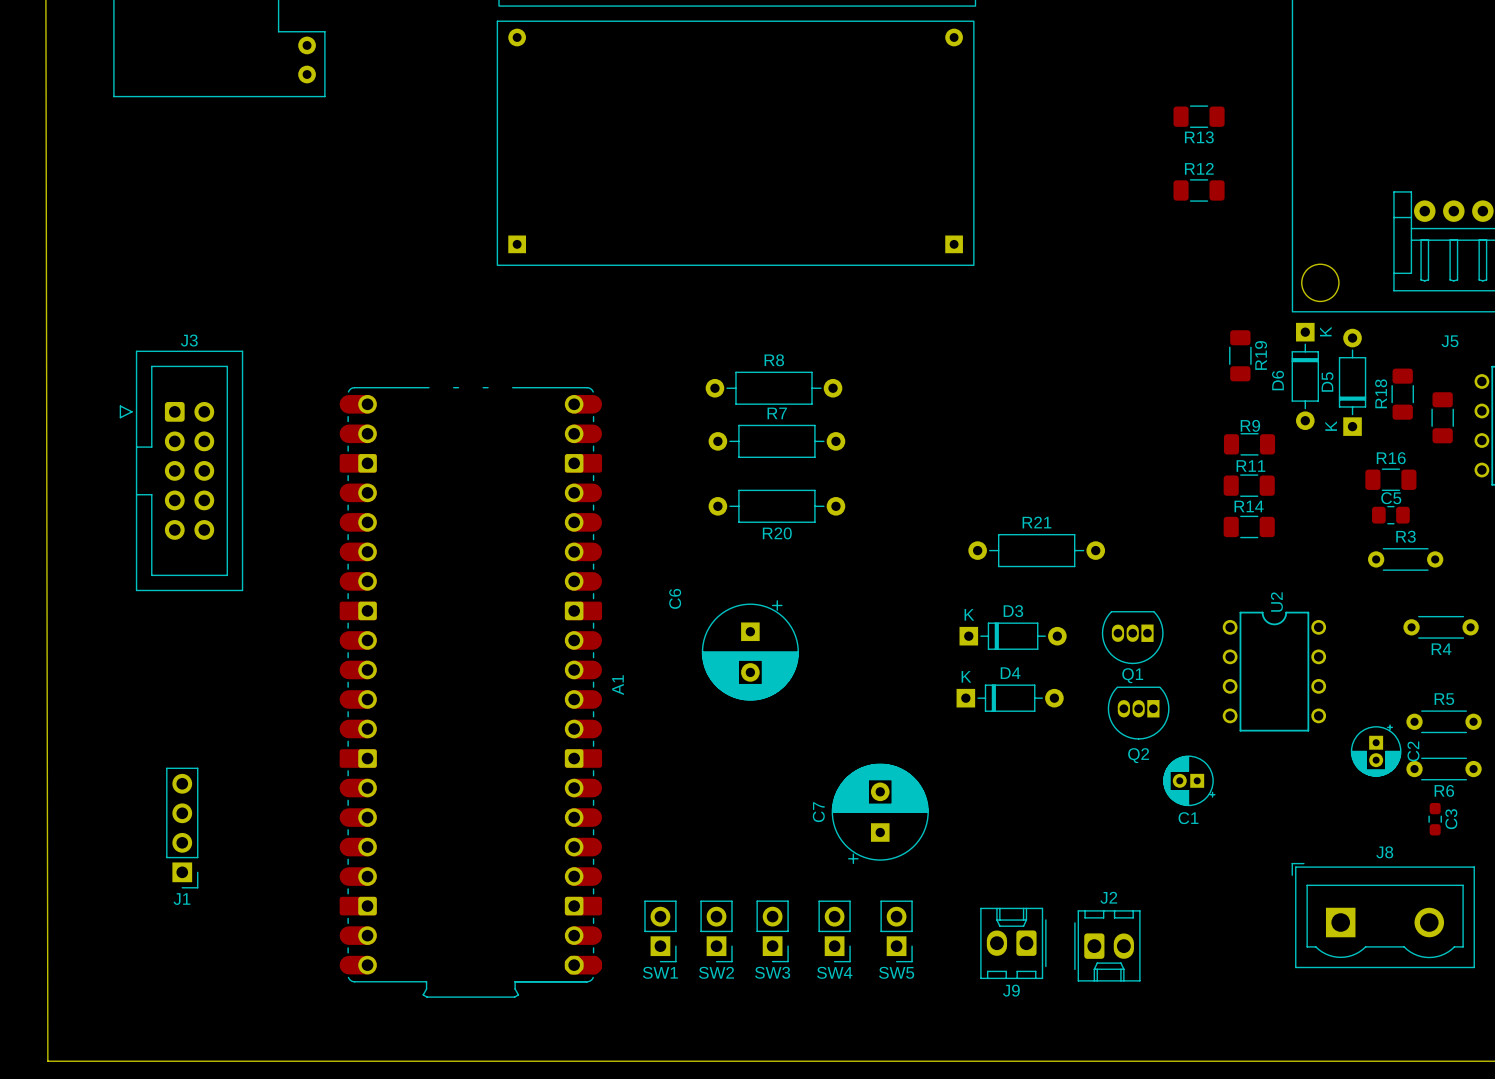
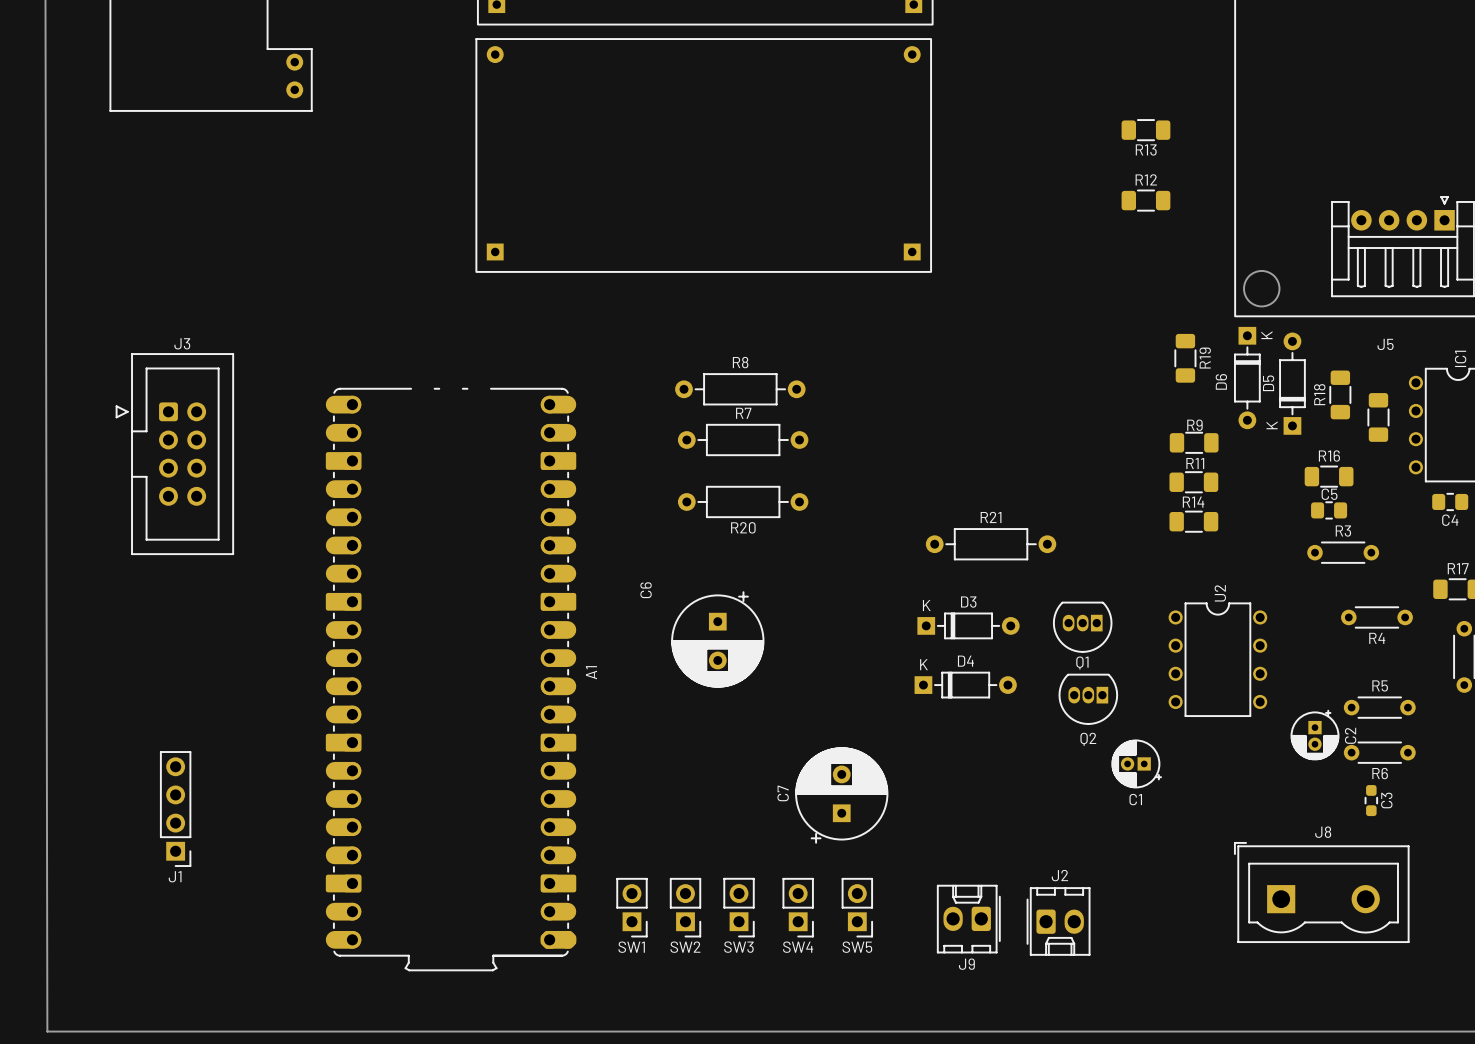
J3 footprint: [119, 350, 244, 592] -> [115, 353, 234, 555]

